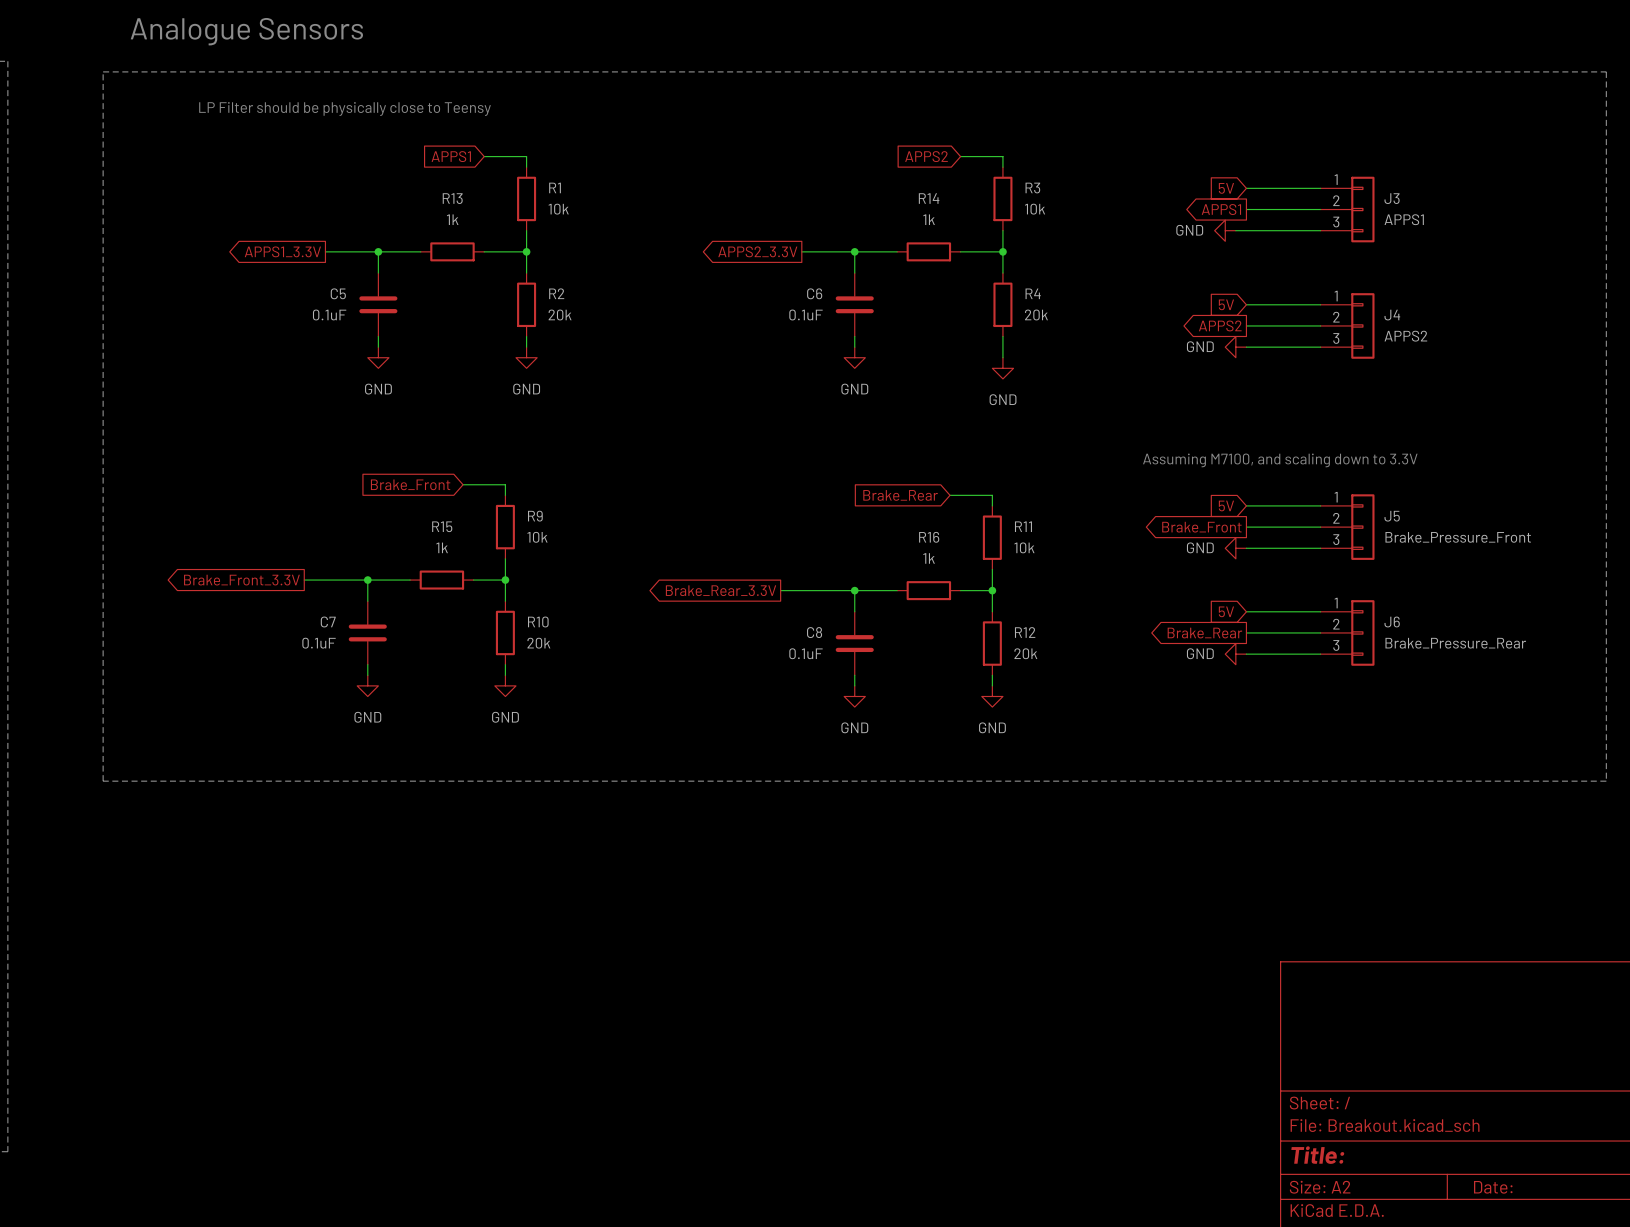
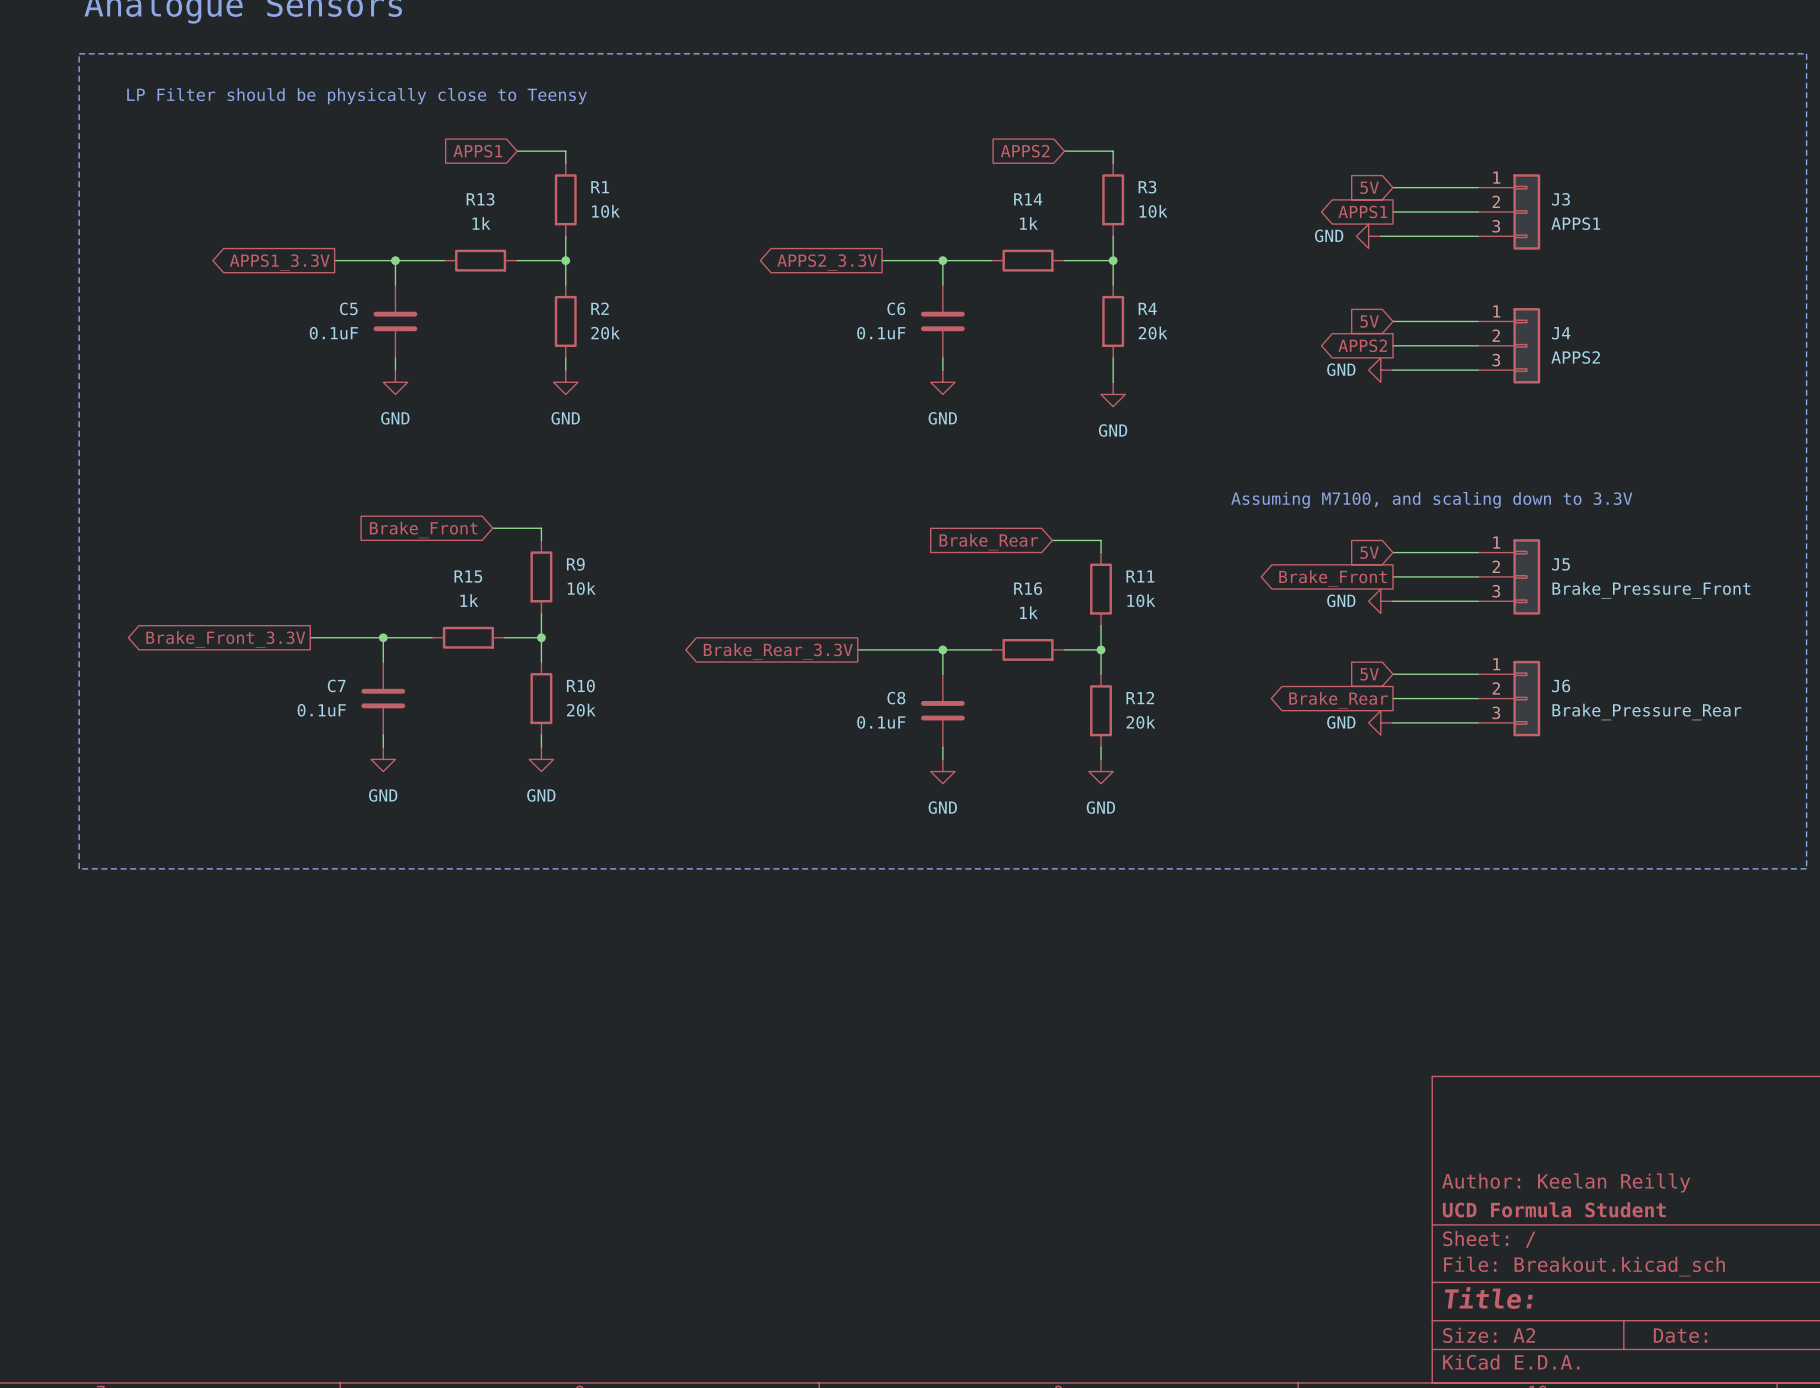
title block: none -> Author: Keelan Reilly (1566, 1182)
title block: none -> UCD Formula Student (1554, 1209)

